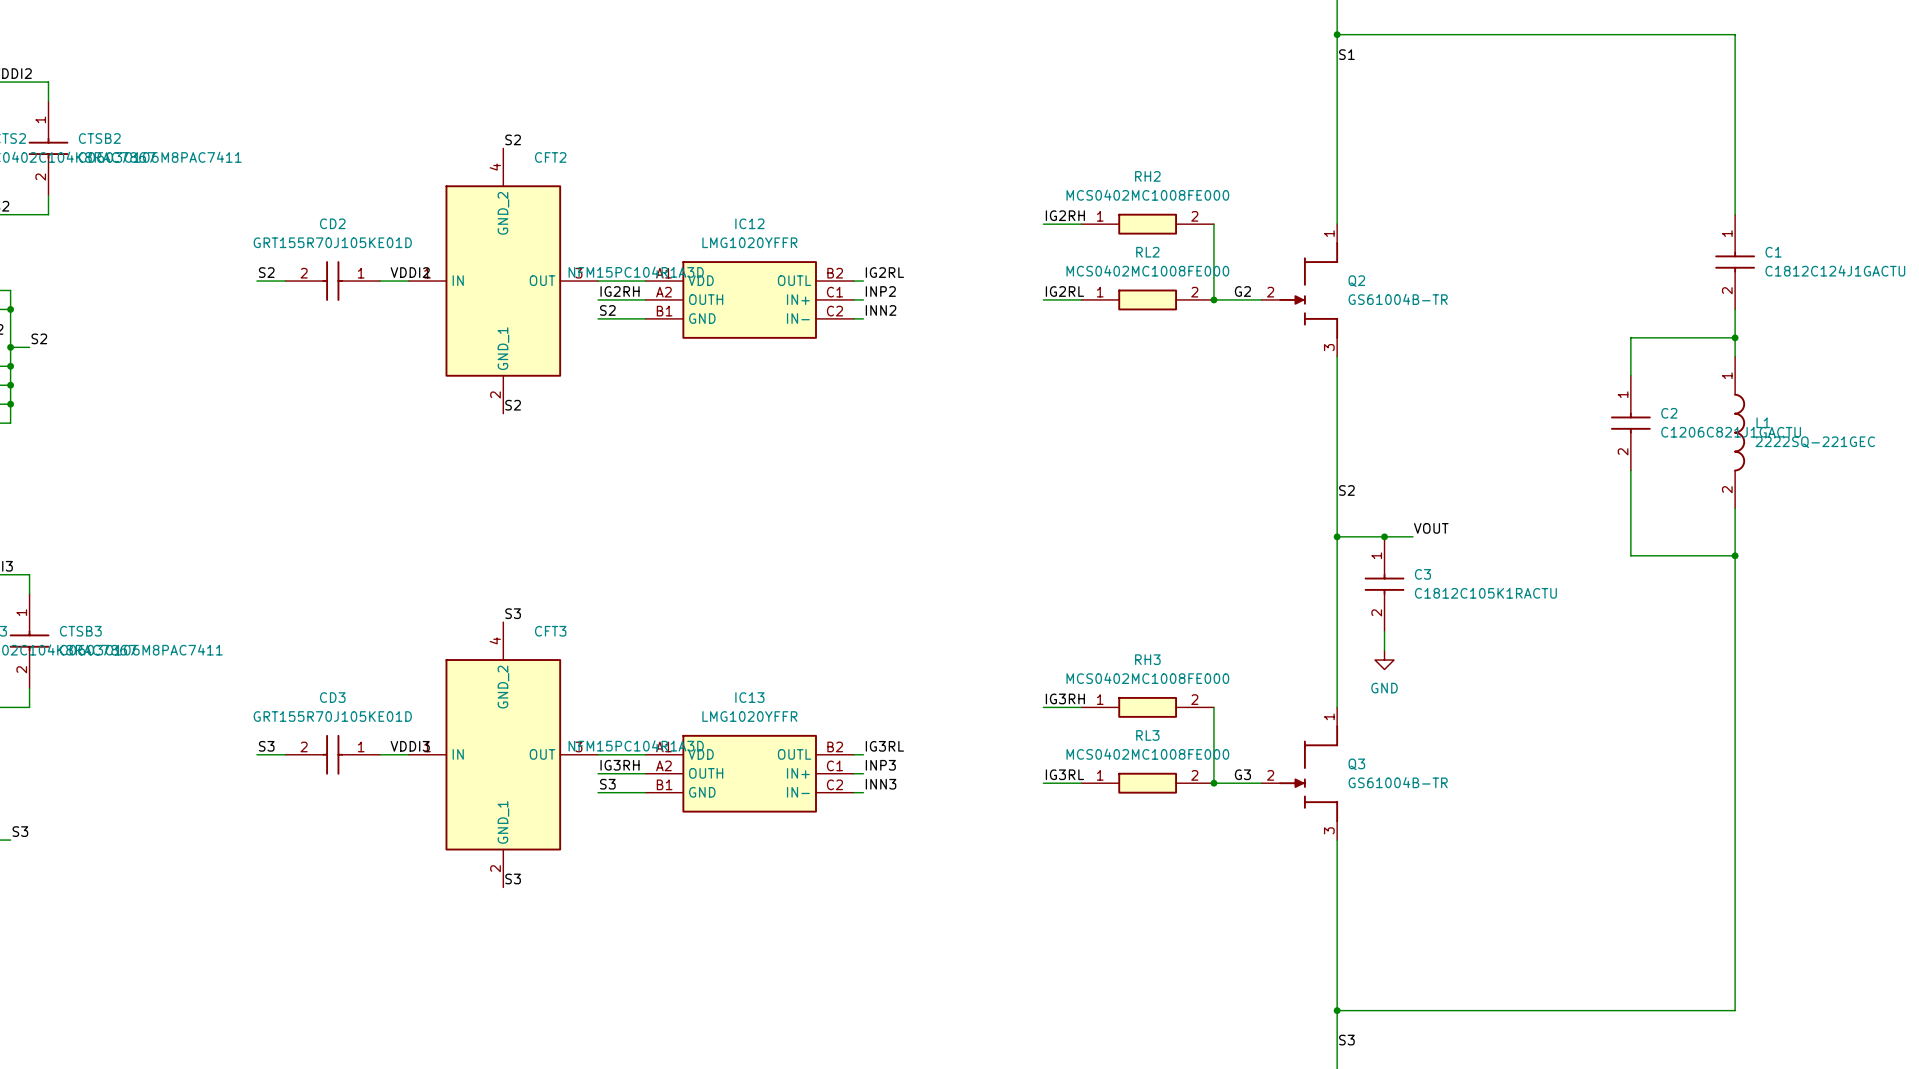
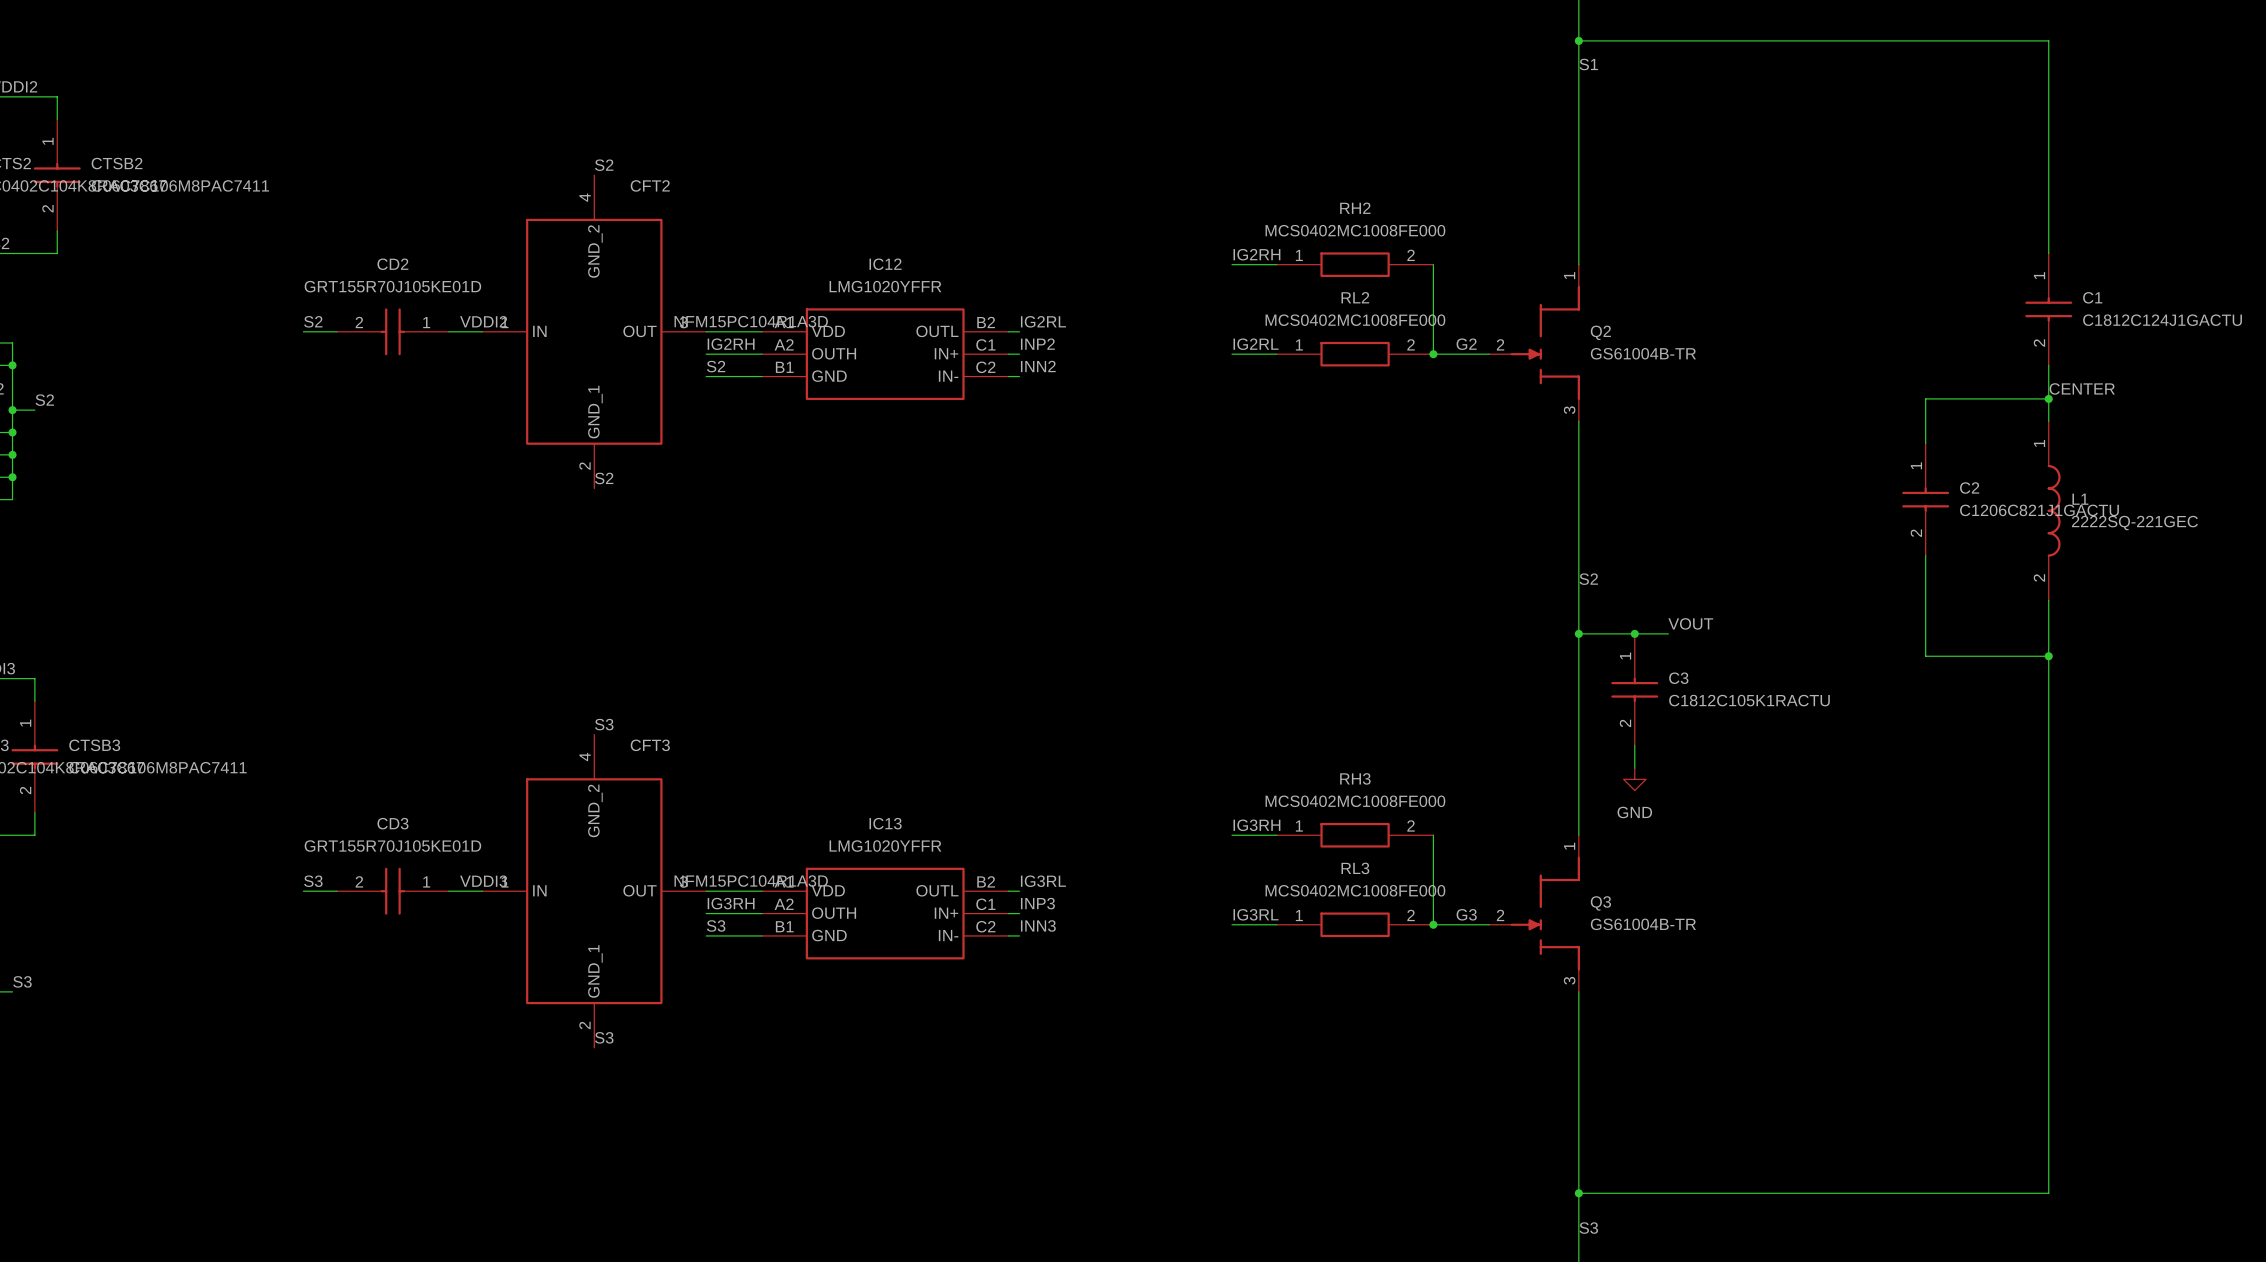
label: none -> CENTER (2082, 388)

